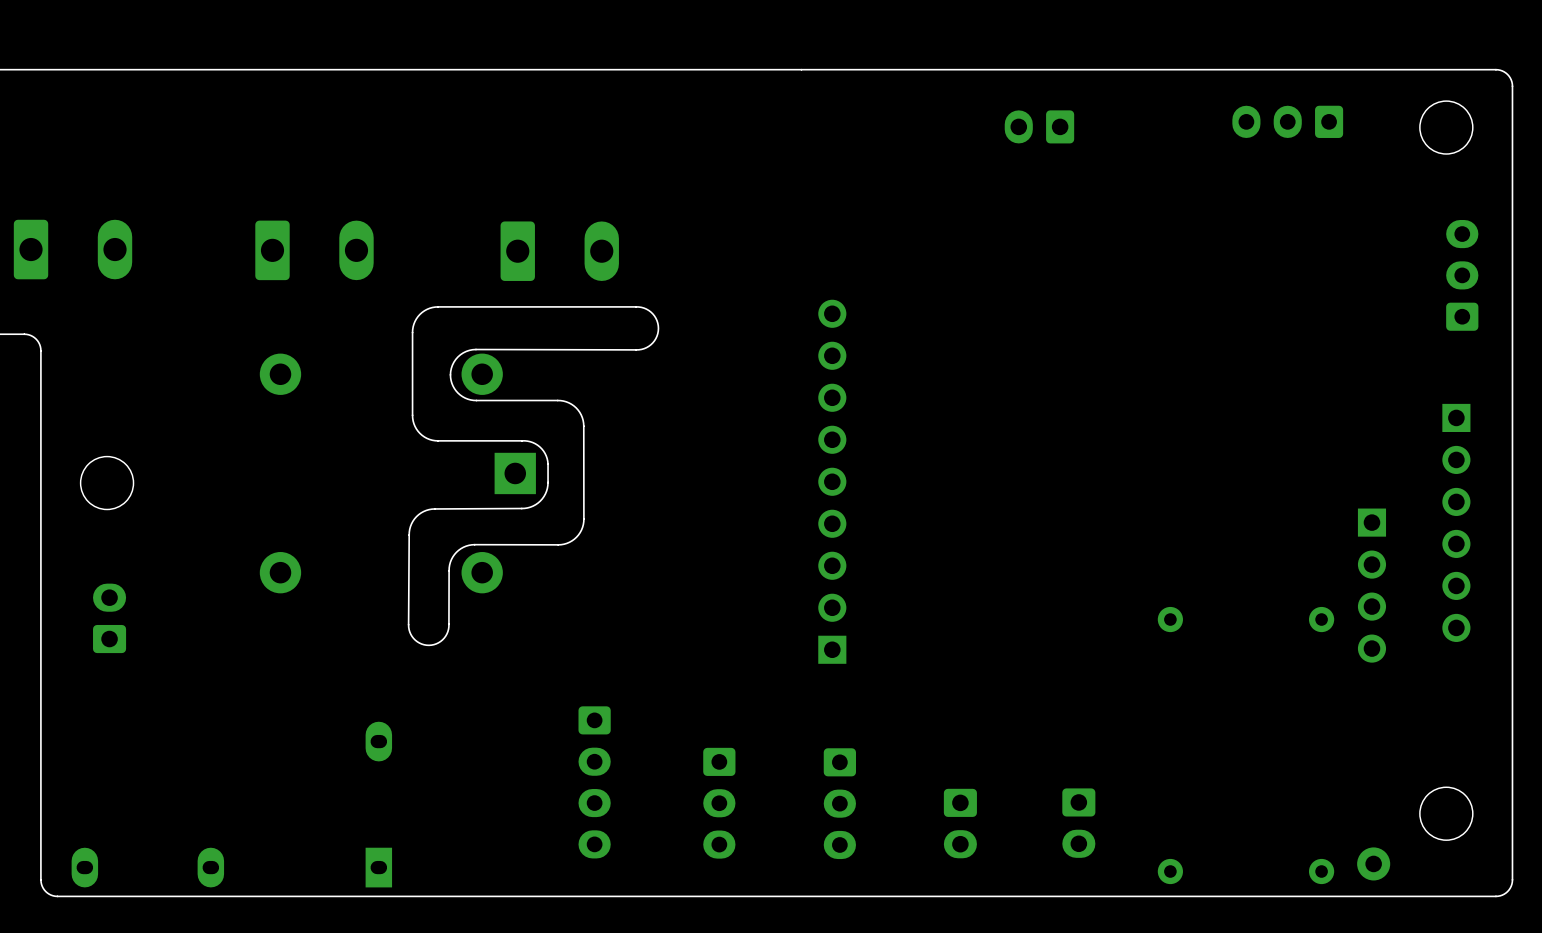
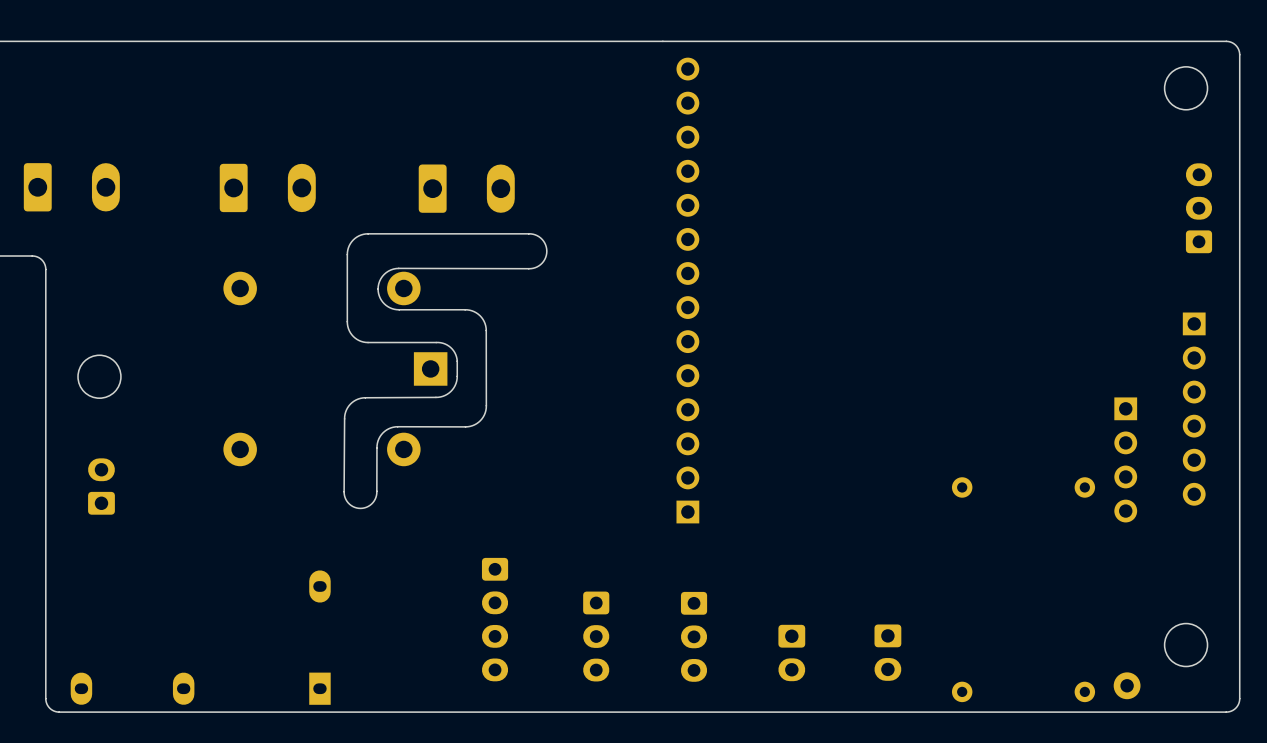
part: (1287, 121) -> none
part: (1039, 126) -> none
part: none -> (687, 290)

